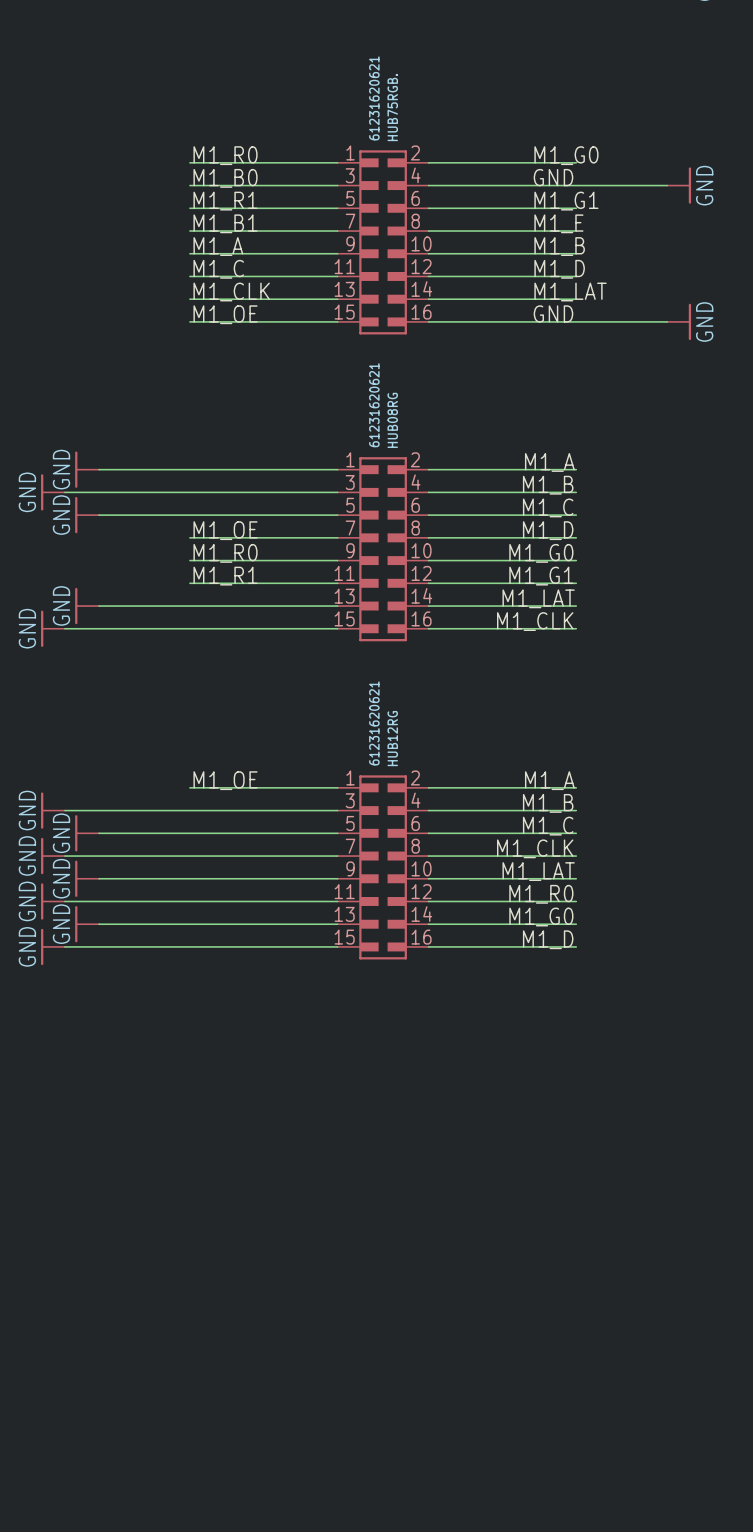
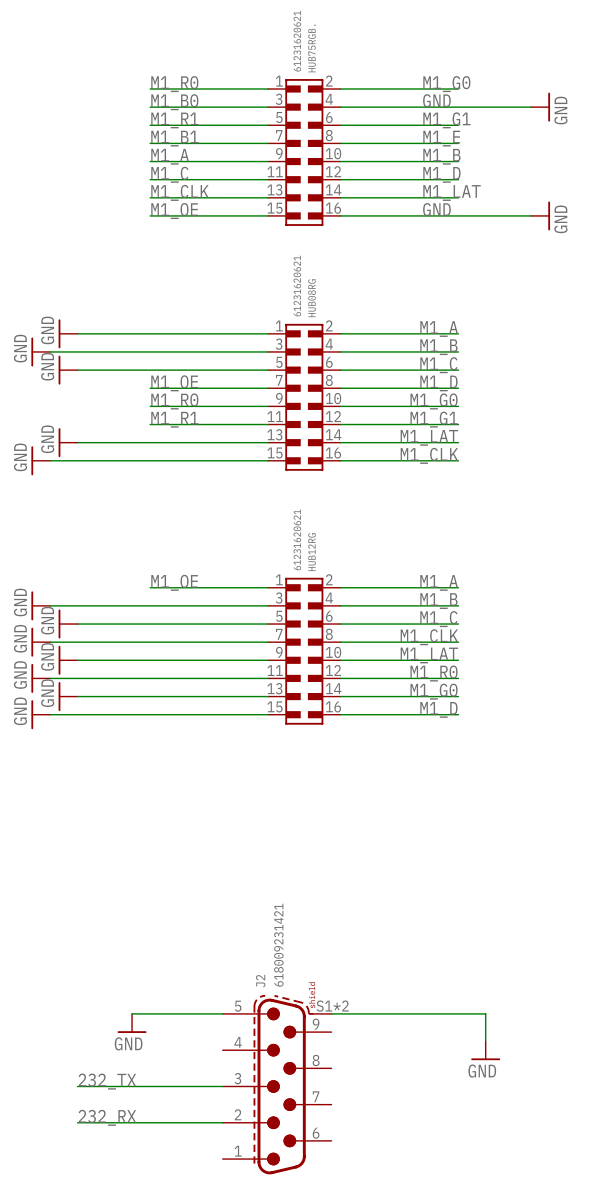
wire: none -> (132, 1013) (222, 1013)
wire: none -> (331, 1013) (485, 1013) (485, 1041)
power symbol: none -> GND (132, 1023)
power symbol: none -> GND (485, 1050)
label: none -> 232_TX (107, 1081)
J2: none -> 618009231421 (277, 1084)
wire: none -> (77, 1086) (222, 1086)
label: none -> 232_RX (107, 1117)
wire: none -> (77, 1122) (222, 1122)

